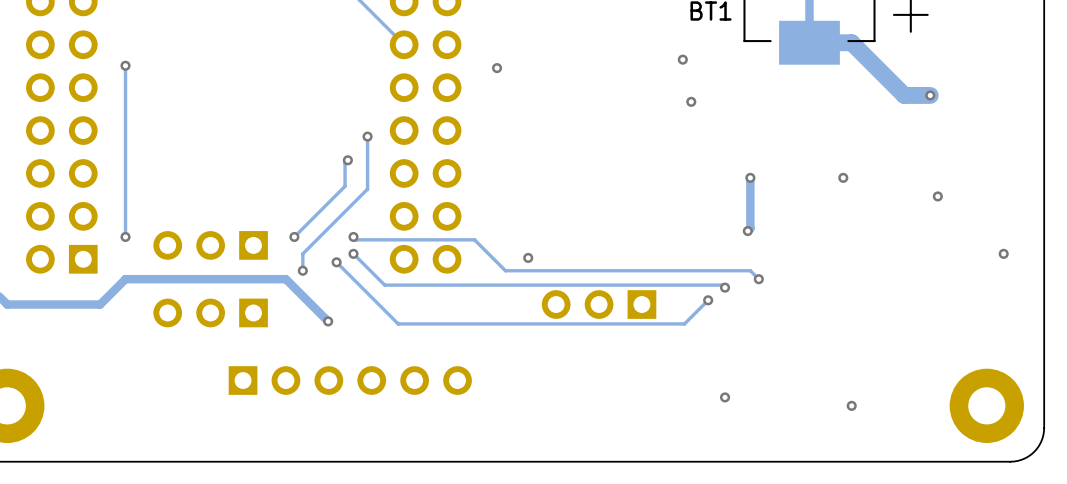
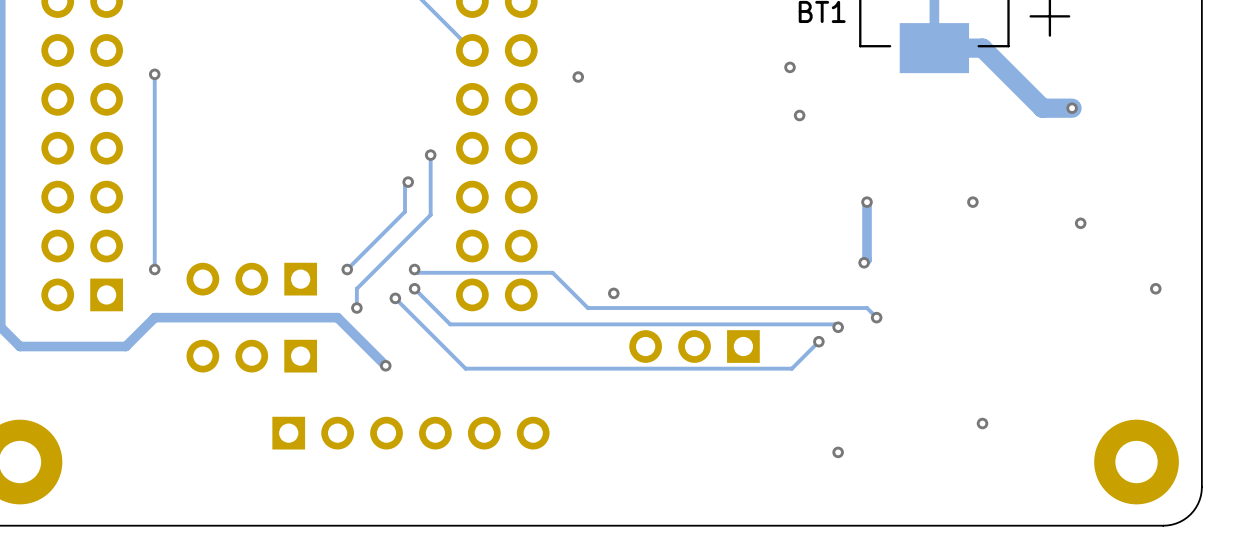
via position: (851, 405) -> (982, 423)

